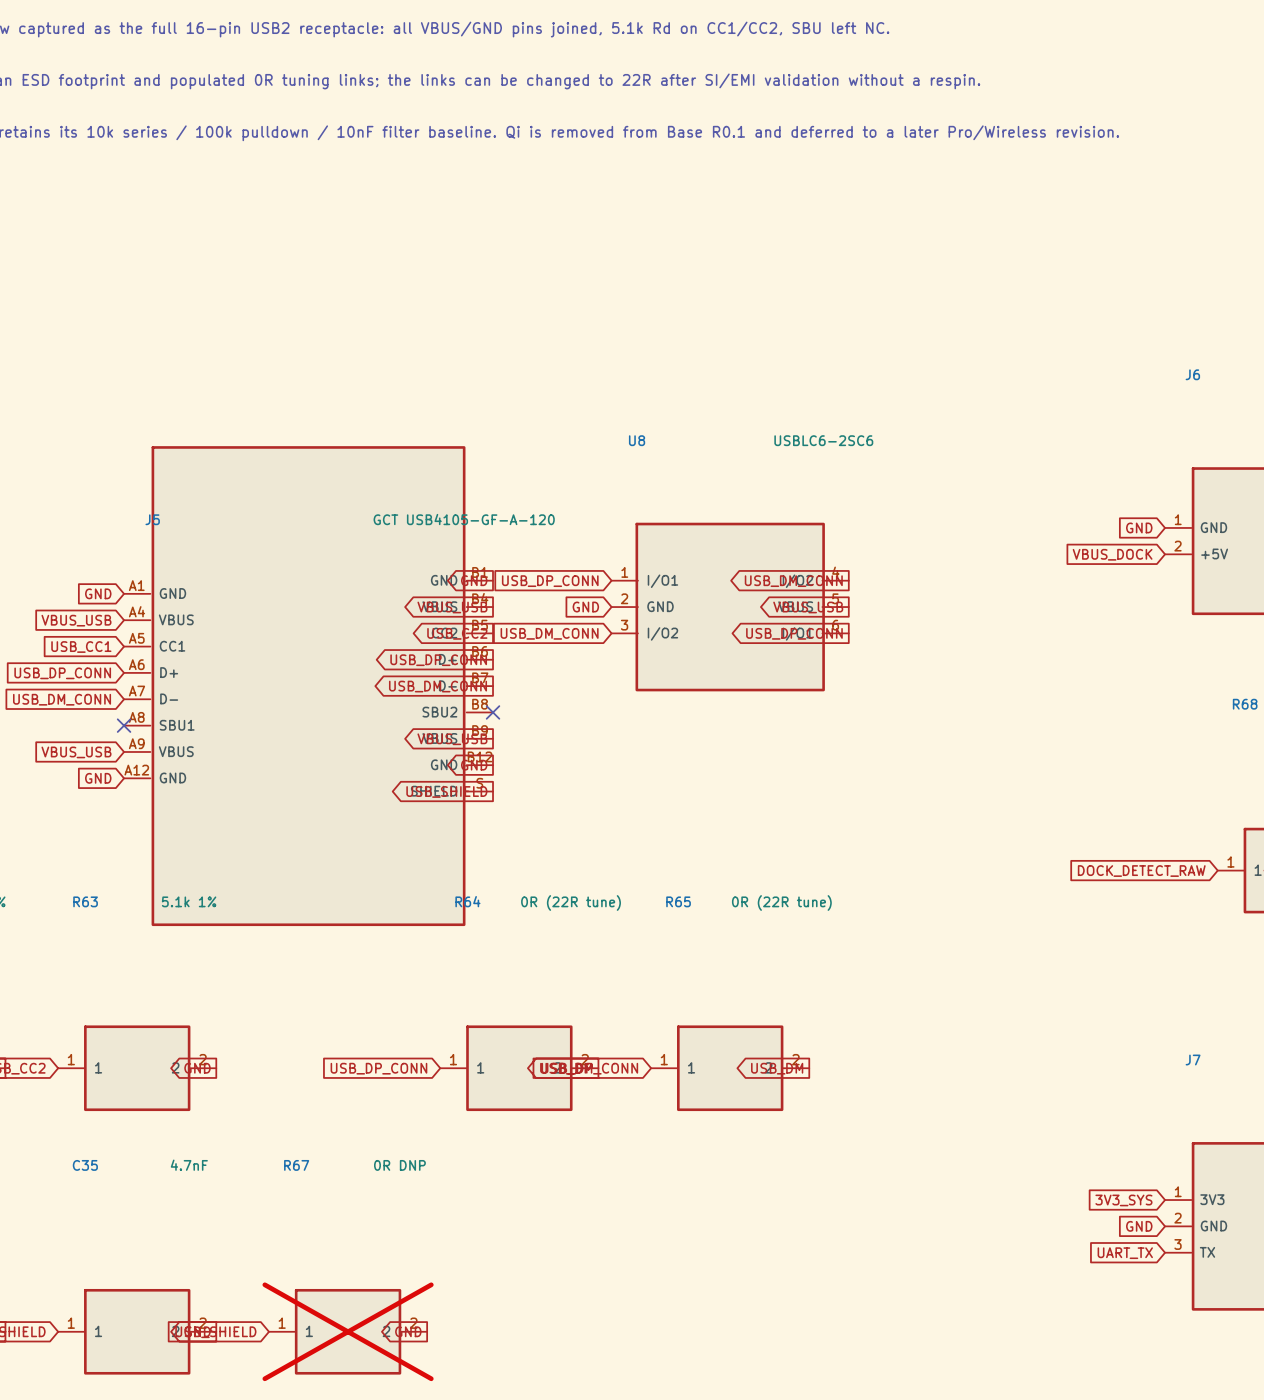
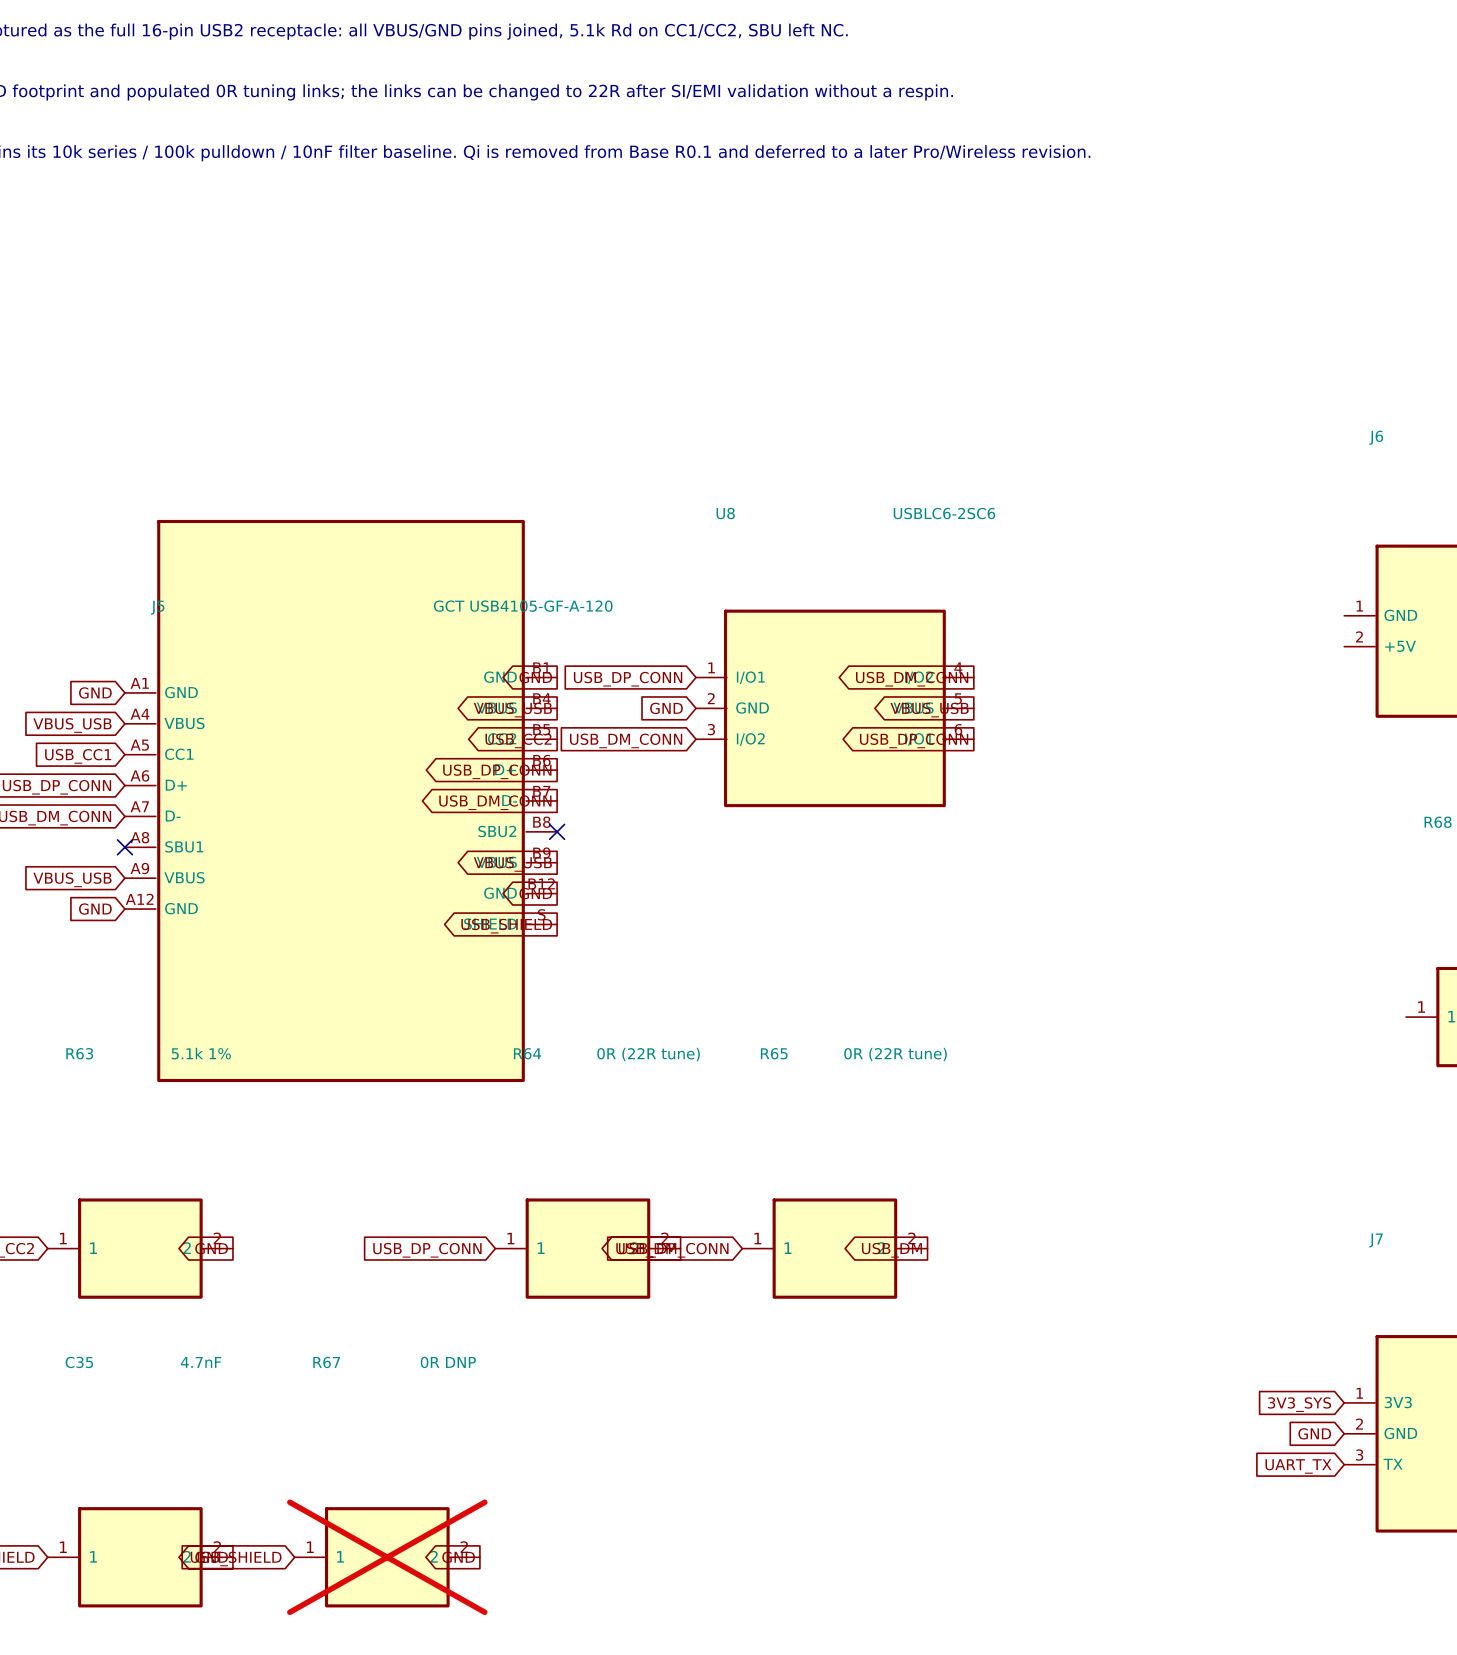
global label: GND (1139, 527) -> none
global label: VBUS_DOCK (1112, 554) -> none
global label: DOCK_DETECT_RAW (1141, 871) -> none

